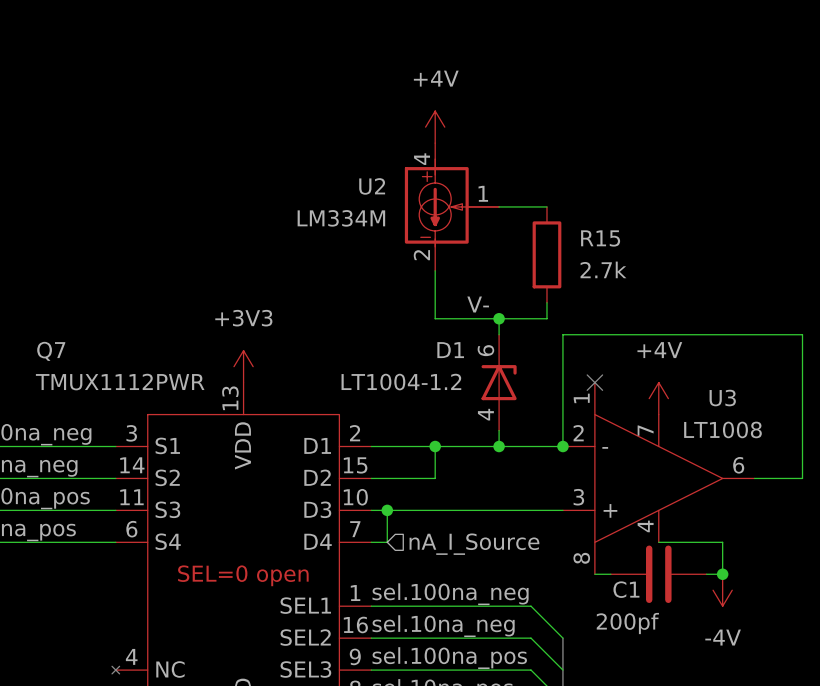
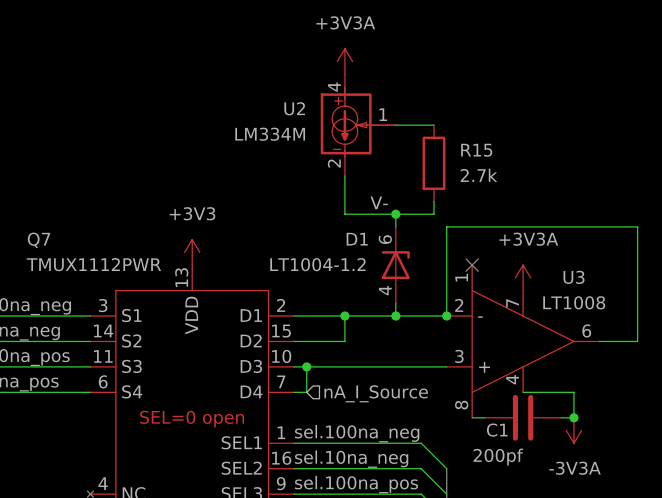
power symbol: +4V (435, 127) -> +3V3A (344, 61)
power symbol: +4V (658, 398) -> +3V3A (523, 277)
power symbol: -4V (722, 590) -> -3V3A (573, 430)

